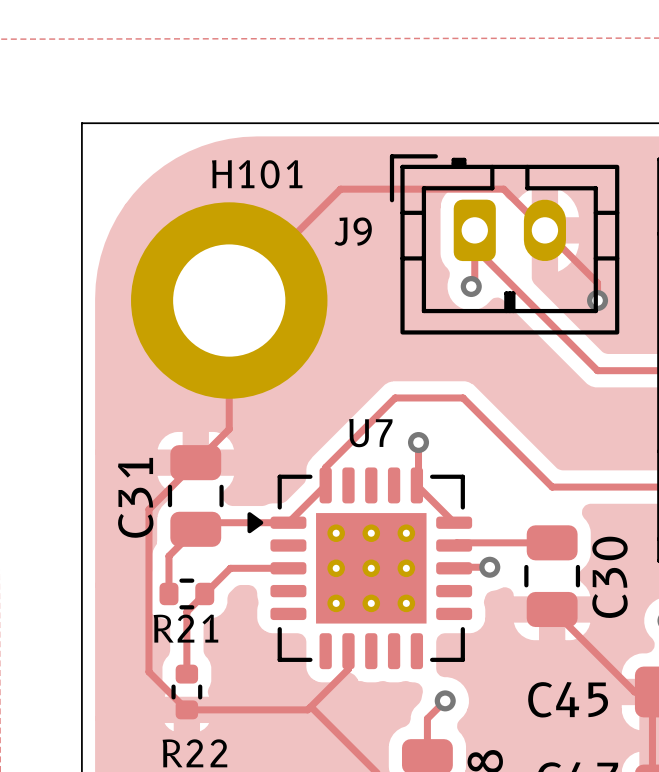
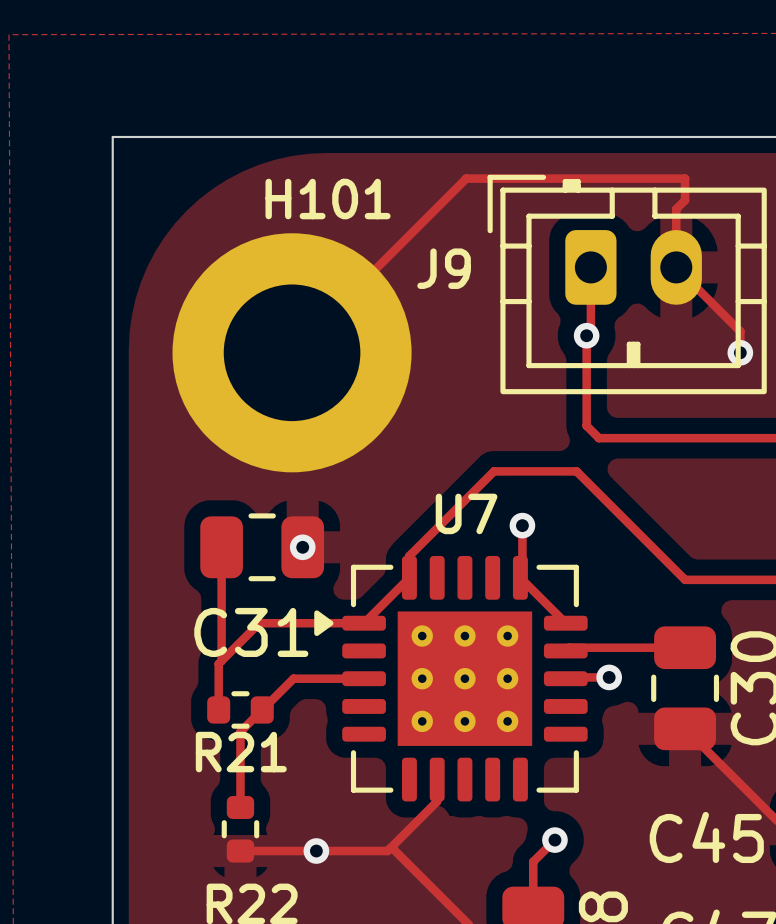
track: (340, 189) (503, 189) (544, 230) -> (427, 217) (466, 178) (685, 178) (685, 200) (676, 209) (676, 267)
track: (474, 247) (597, 370) -> (586, 335) (586, 425) (599, 438) (740, 438)
track: (229, 300) (229, 429) (148, 509) (148, 671) (186, 709) -> none
track: none -> (221, 547) (221, 660)
via: none -> (302, 547)
C31 rotation: 0° (195, 495) -> 90° clockwise (262, 547)
C31 name position: C31 (135, 497) -> C31 (251, 632)
via: none -> (316, 851)

